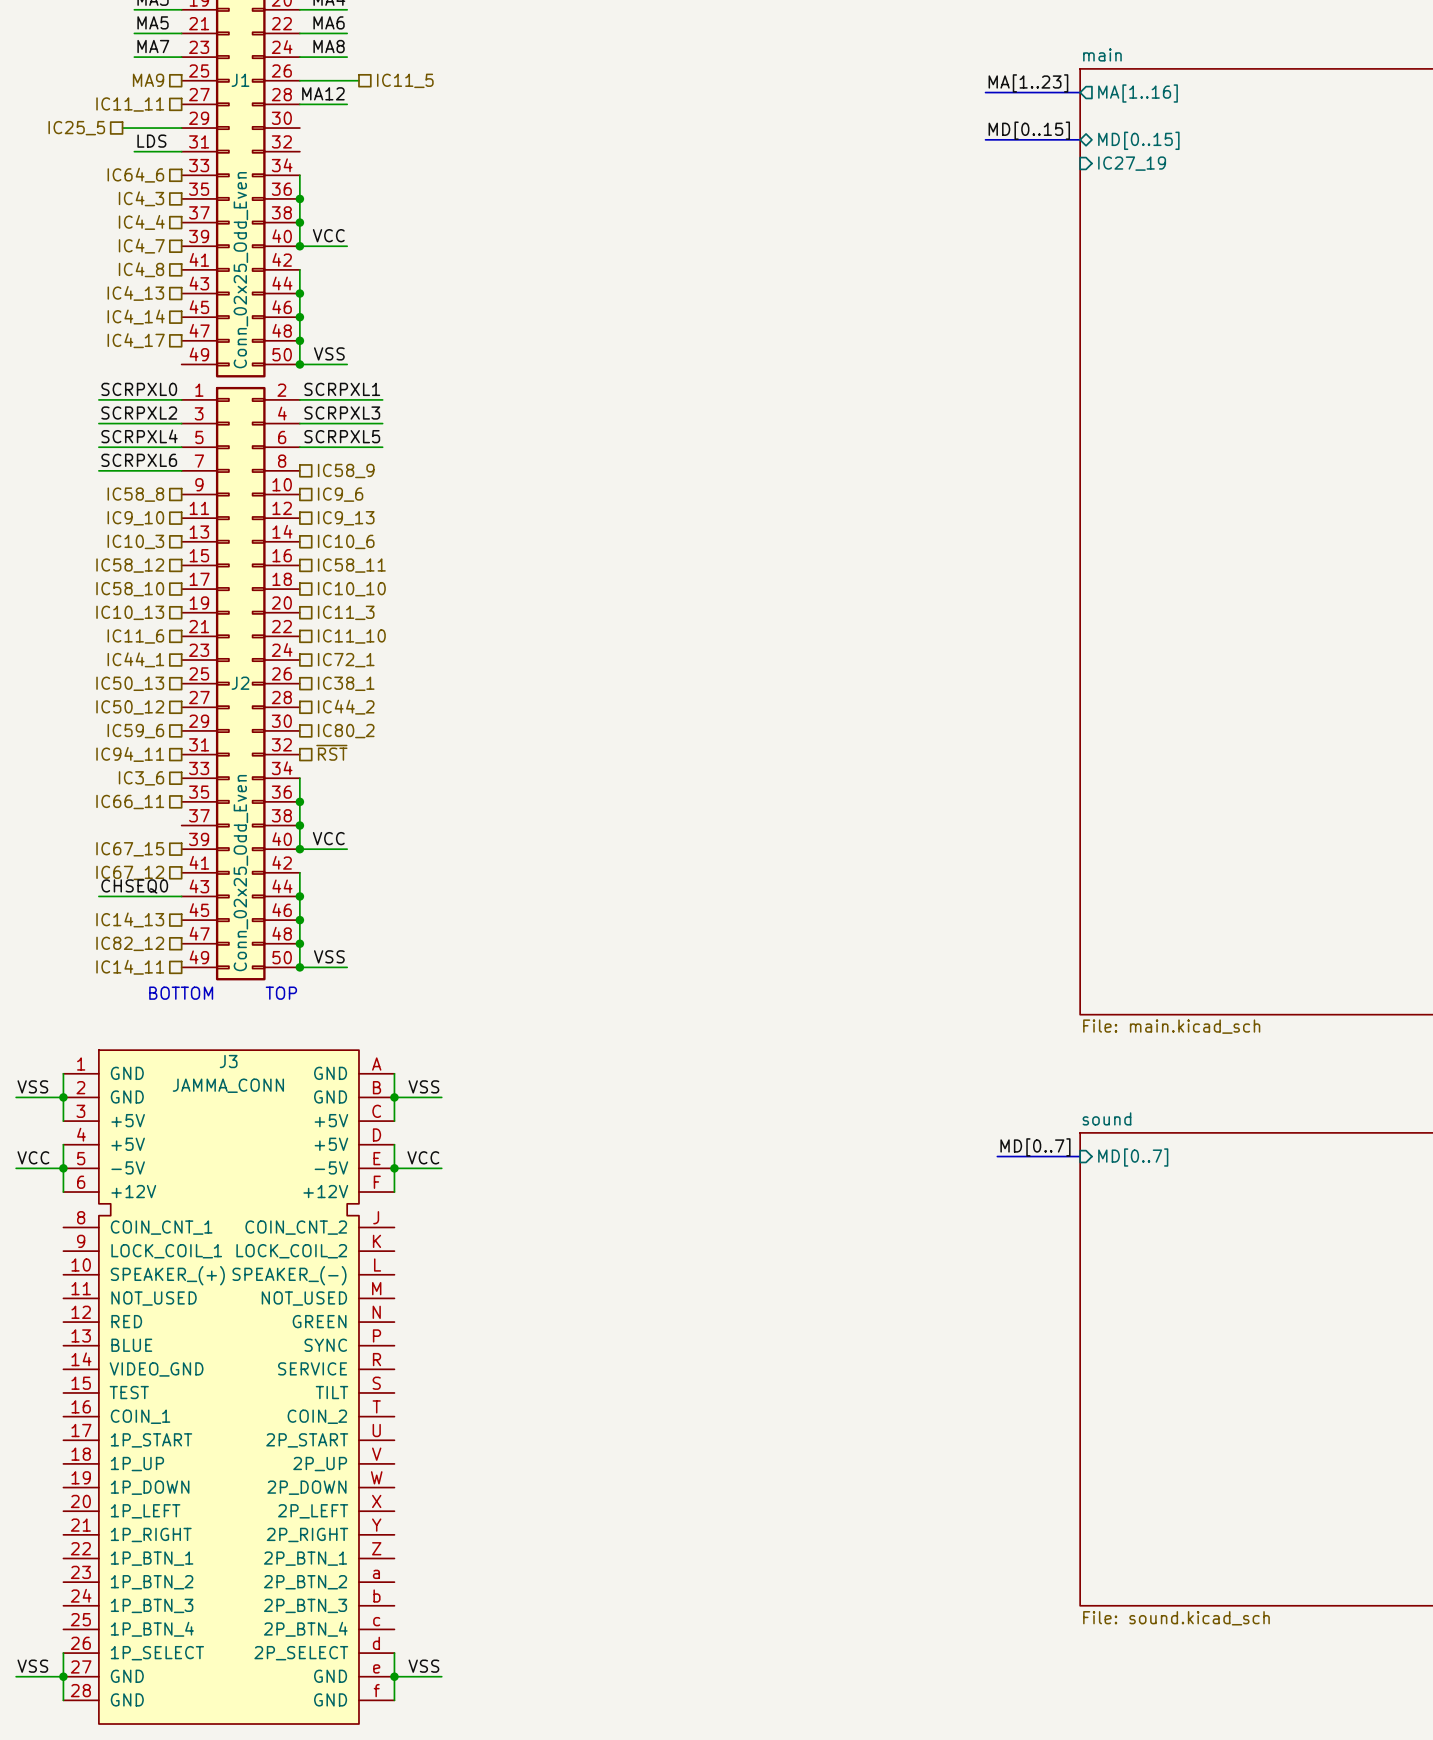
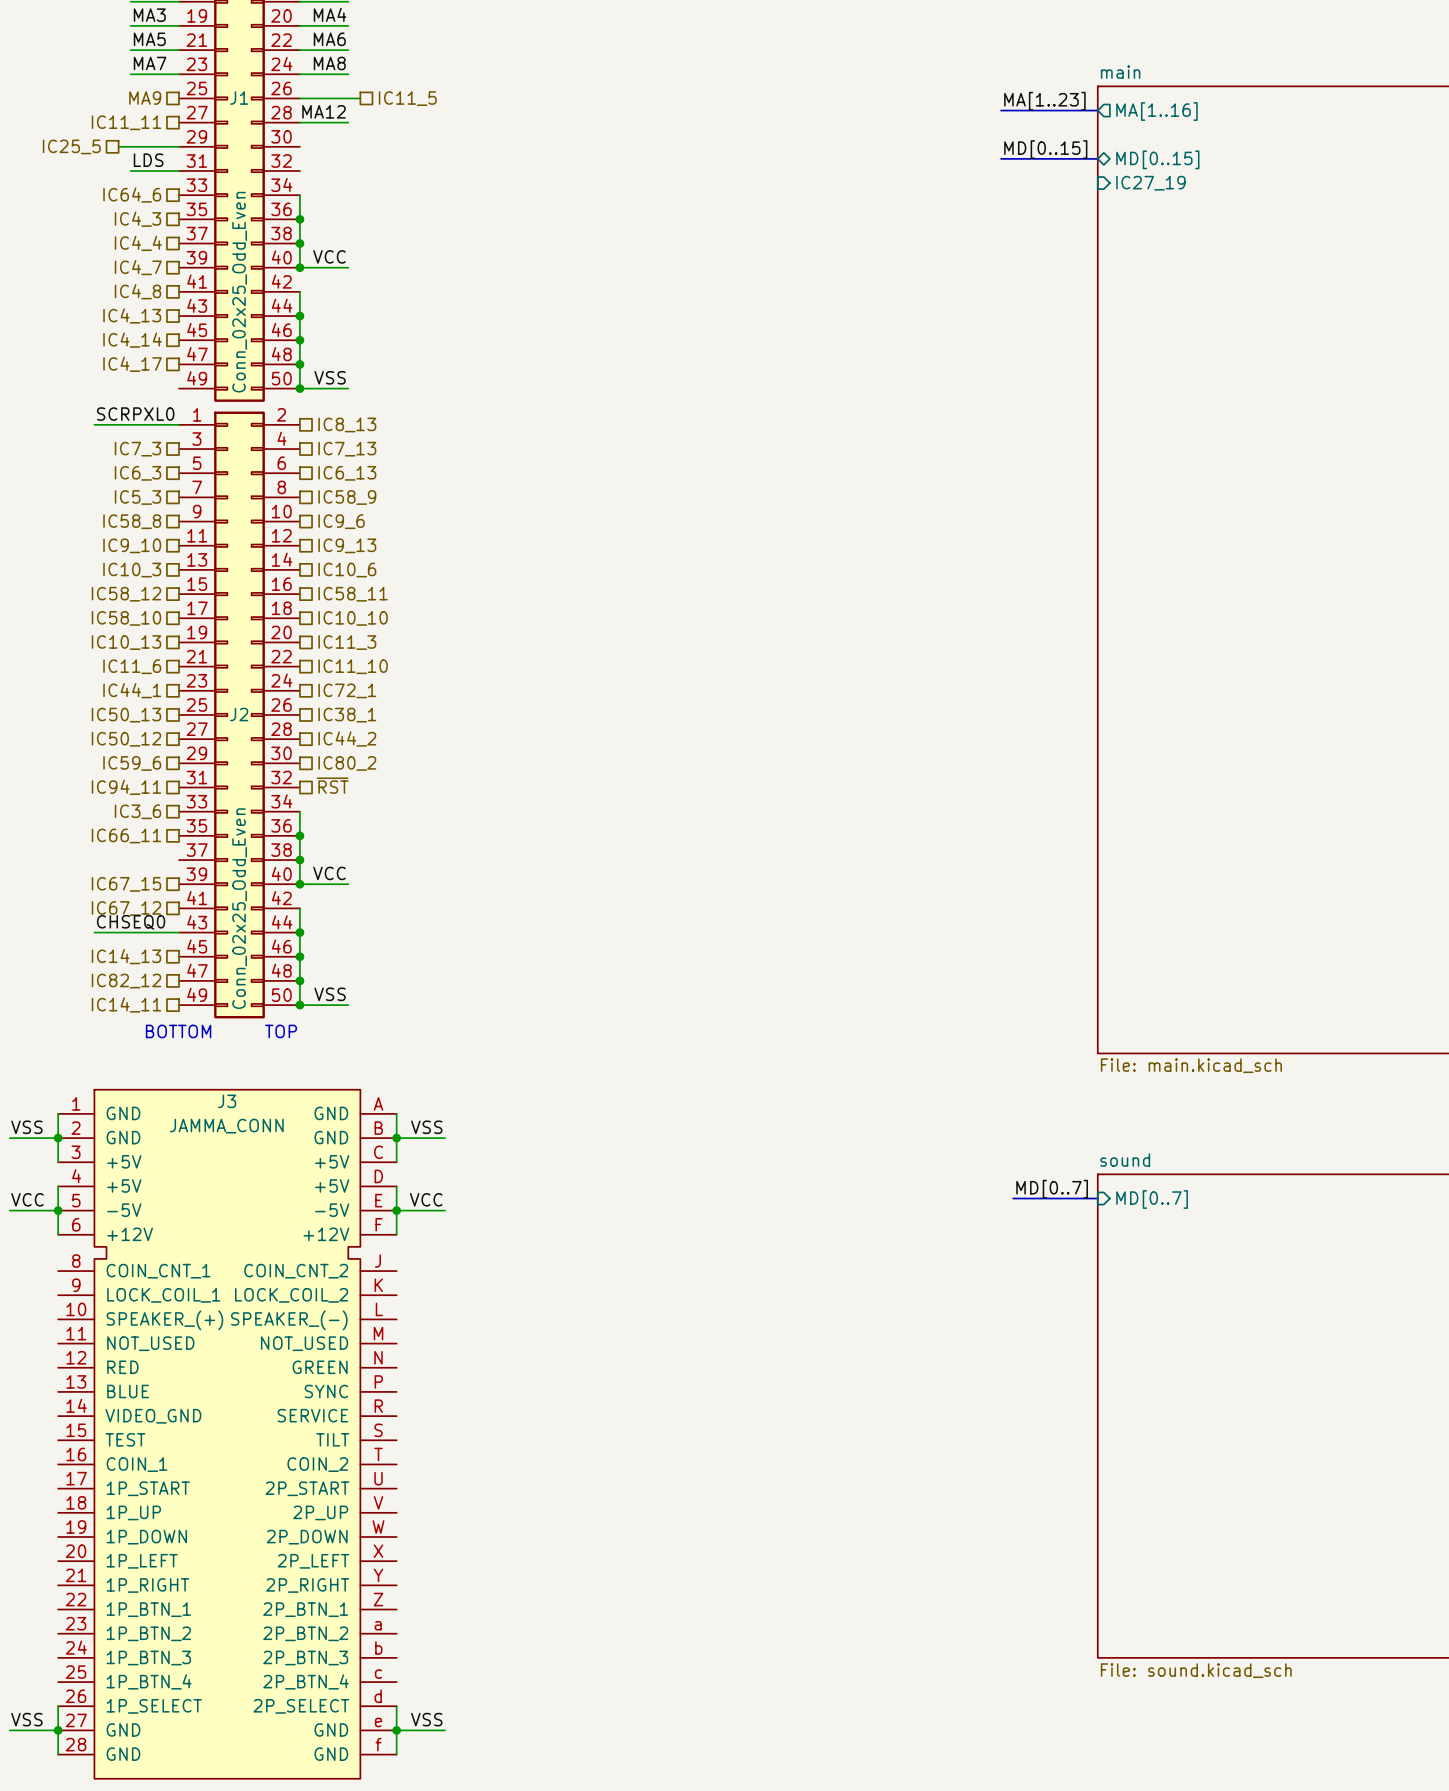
label: SCRPXL1 (342, 389) -> none
wire: (299, 399) (382, 399) -> none
hierarchical label: none -> IC8_13 (347, 424)
label: SCRPXL2 (139, 413) -> none
label: SCRPXL3 (342, 413) -> none
wire: (98, 423) (181, 423) -> none
hierarchical label: none -> IC7_3 (137, 449)
wire: (299, 423) (382, 423) -> none
hierarchical label: none -> IC7_13 (347, 449)
label: SCRPXL4 (139, 436) -> none
label: SCRPXL5 (342, 436) -> none
wire: (98, 447) (181, 447) -> none
hierarchical label: none -> IC6_3 (137, 473)
wire: (299, 447) (382, 447) -> none
hierarchical label: none -> IC6_13 (347, 473)
label: SCRPXL6 (139, 460) -> none
wire: (98, 470) (181, 470) -> none
hierarchical label: none -> IC5_3 (137, 497)

